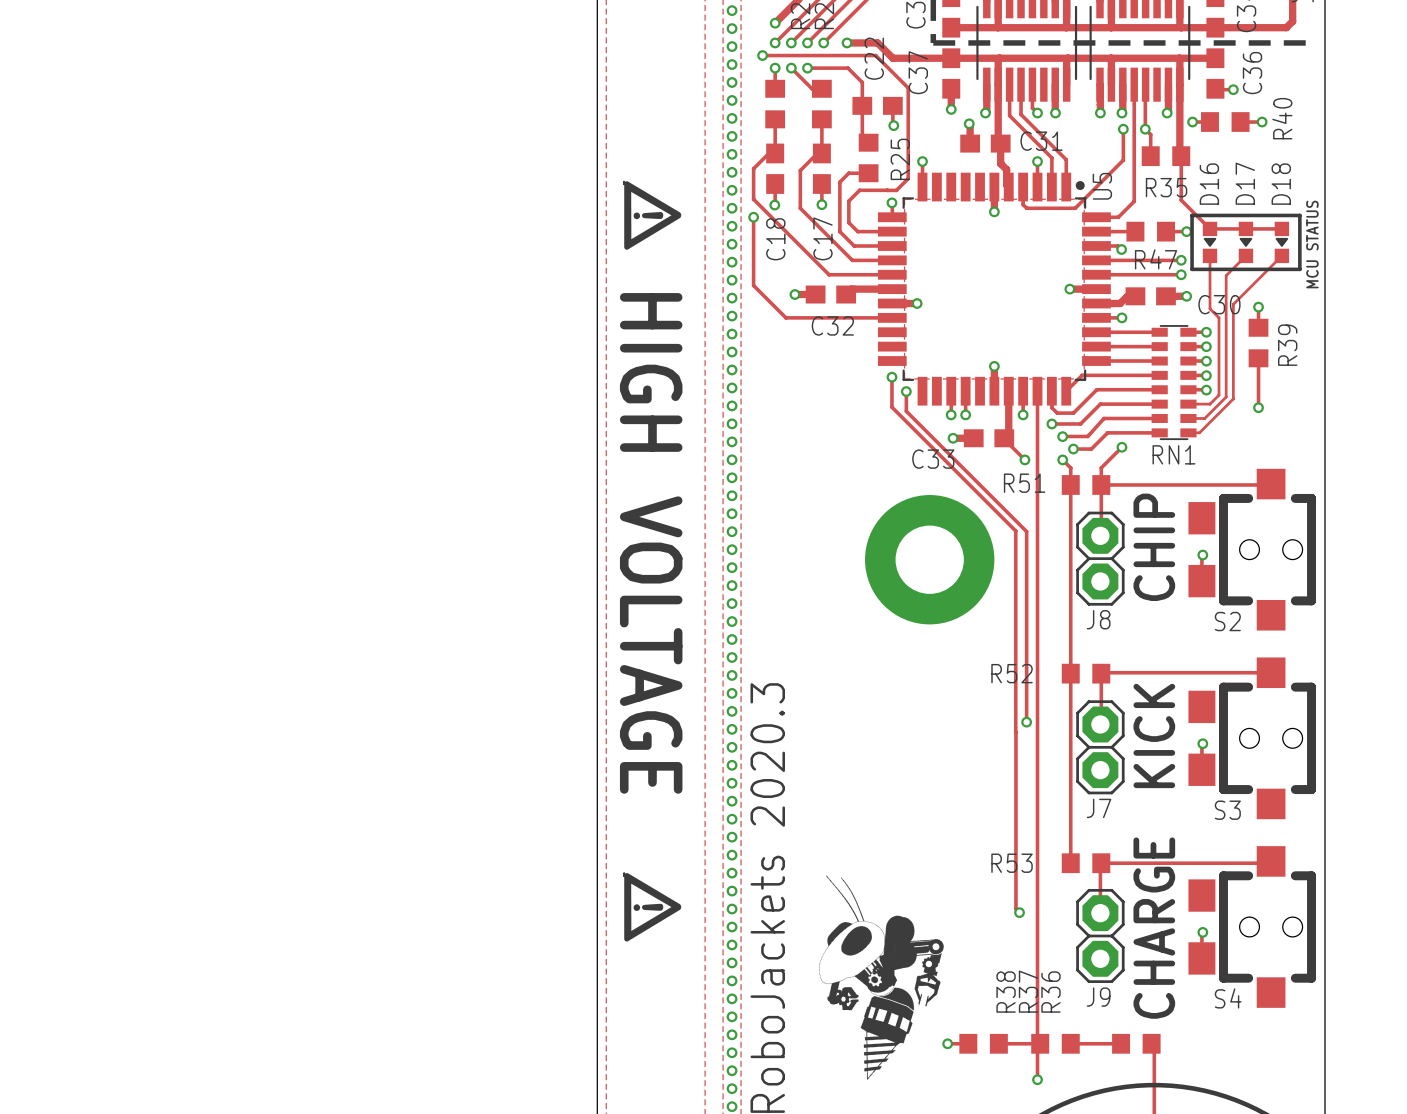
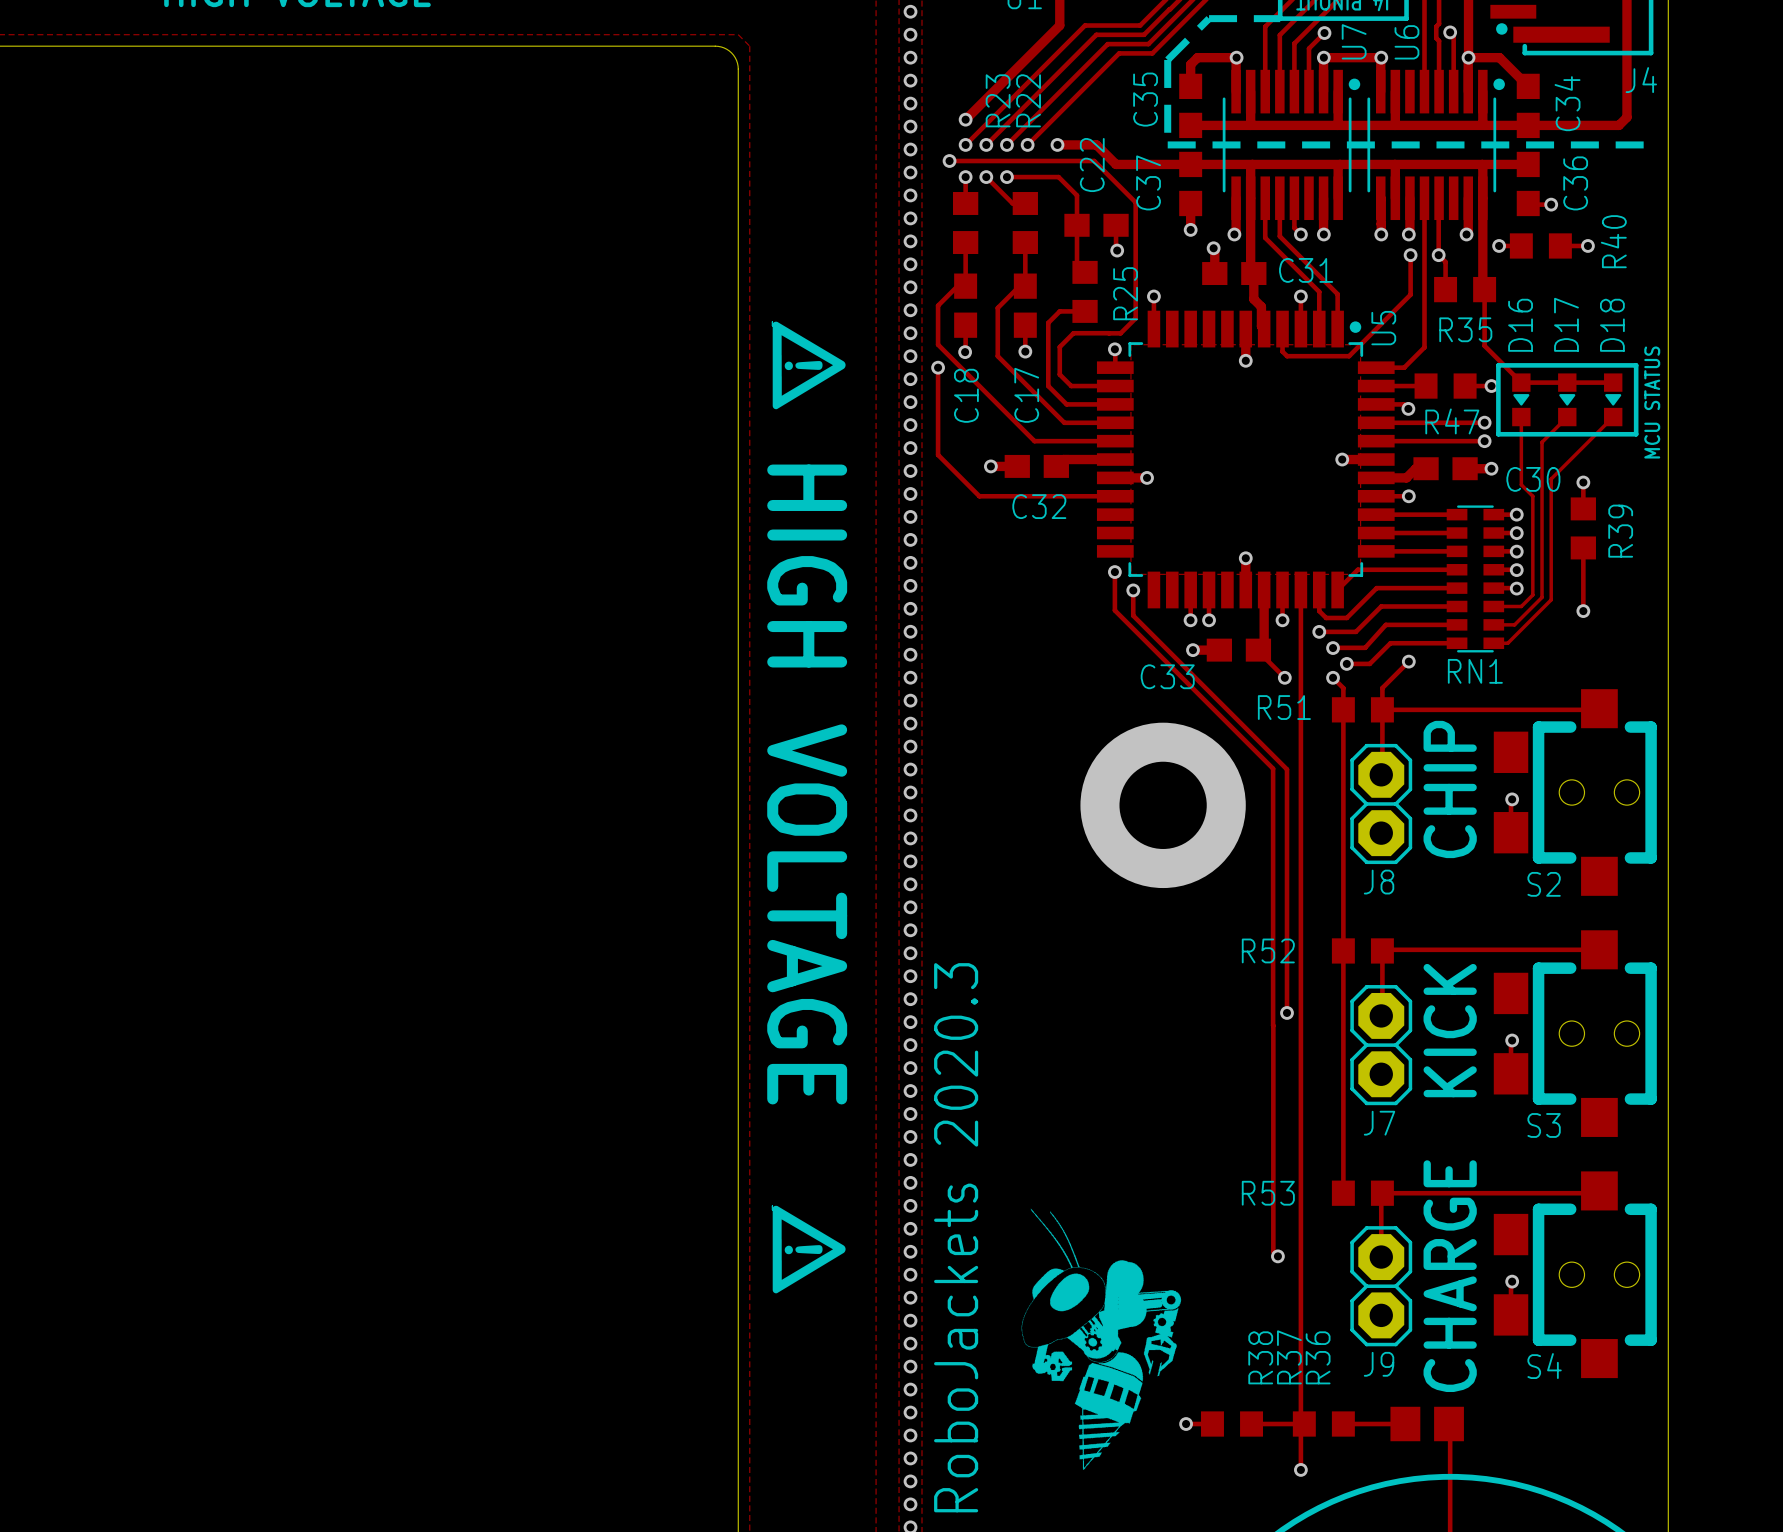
R36 footprint: [1112, 1033, 1161, 1054] -> [1390, 1406, 1464, 1442]

